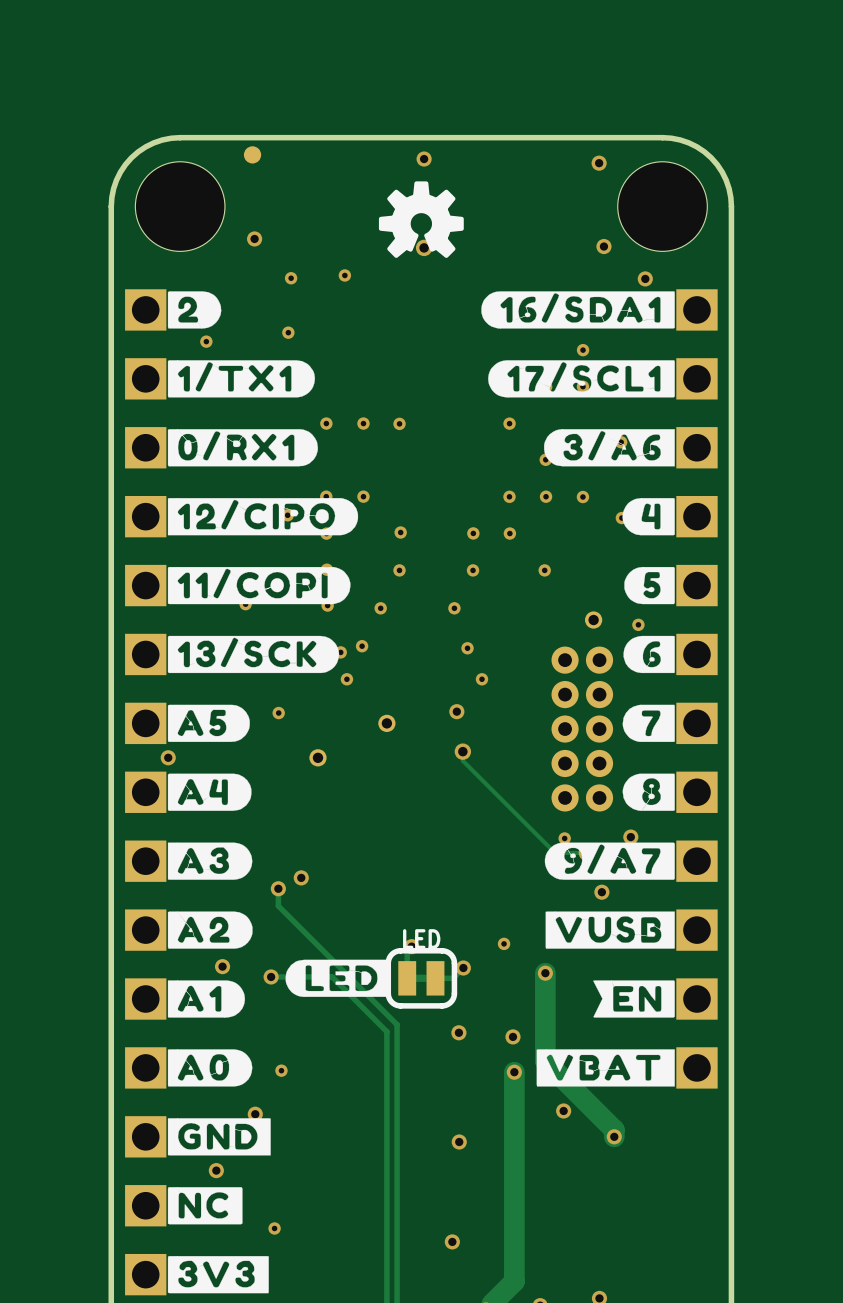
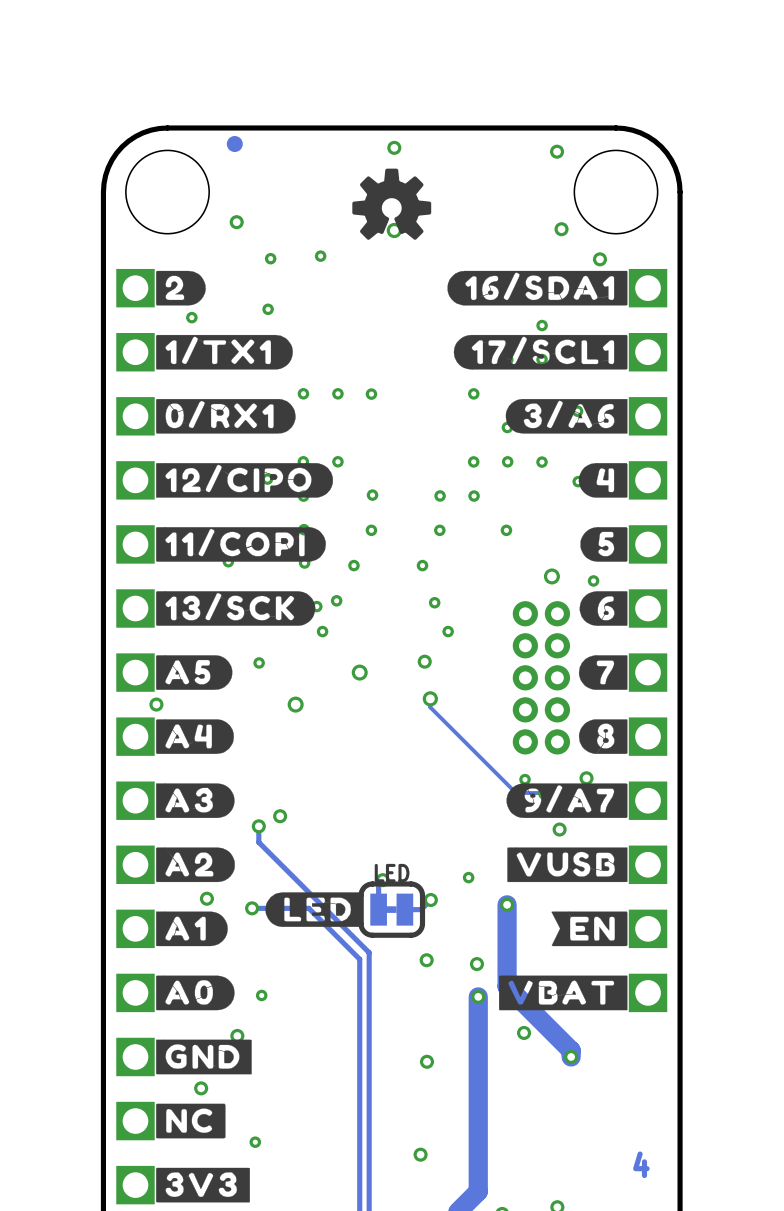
text: none -> 4 (641, 1164)

